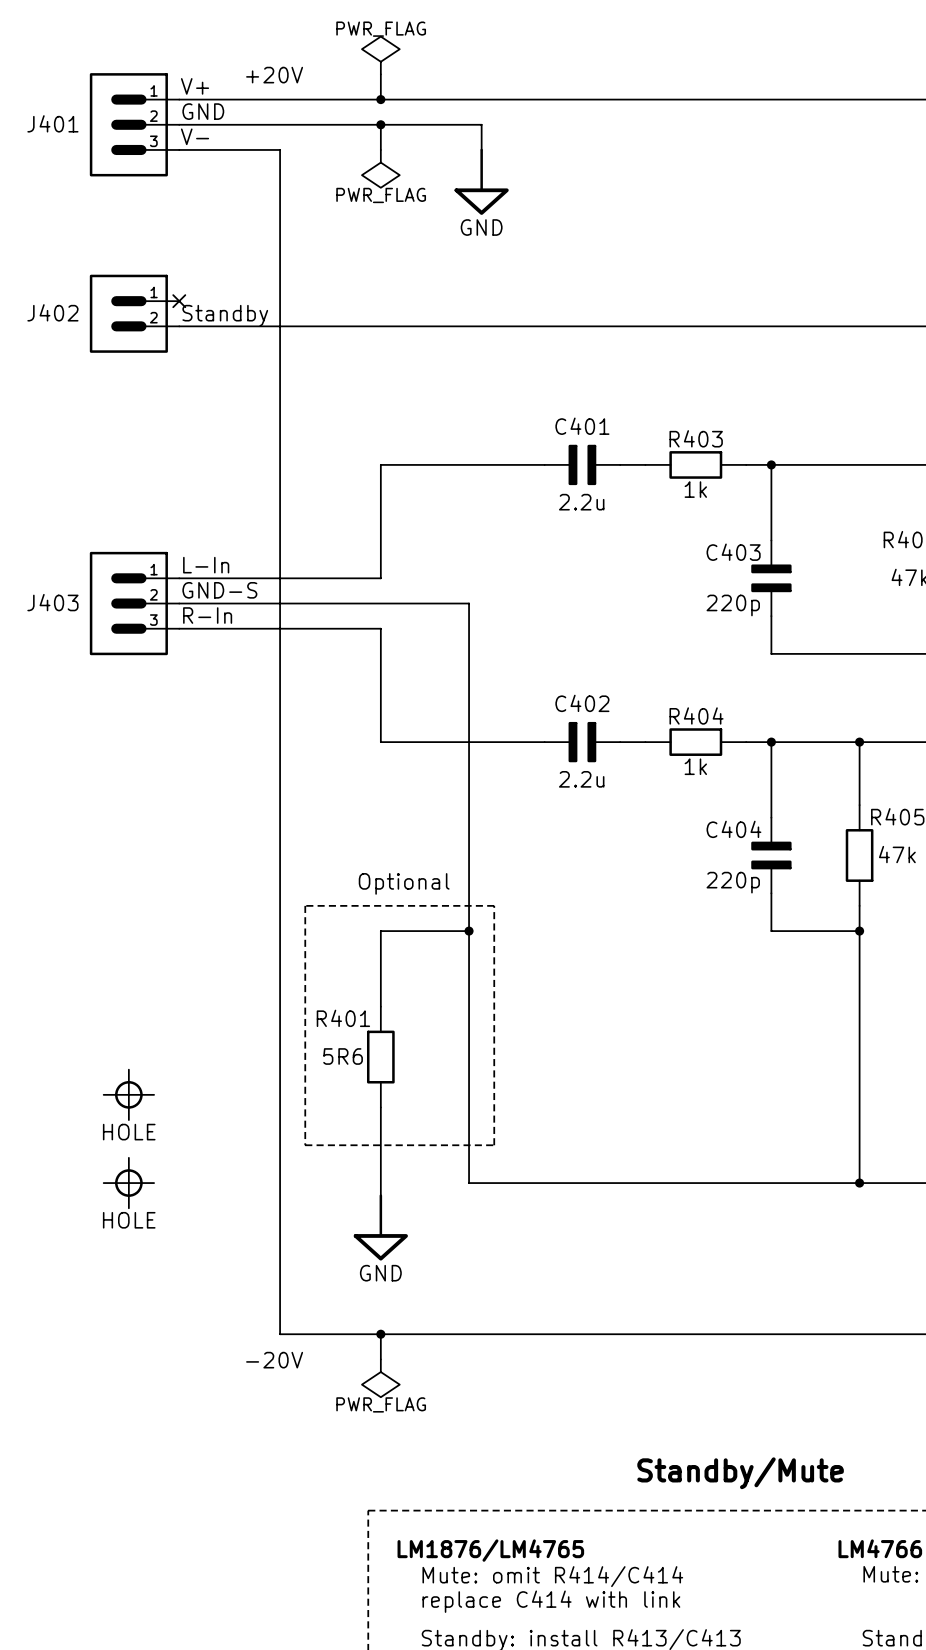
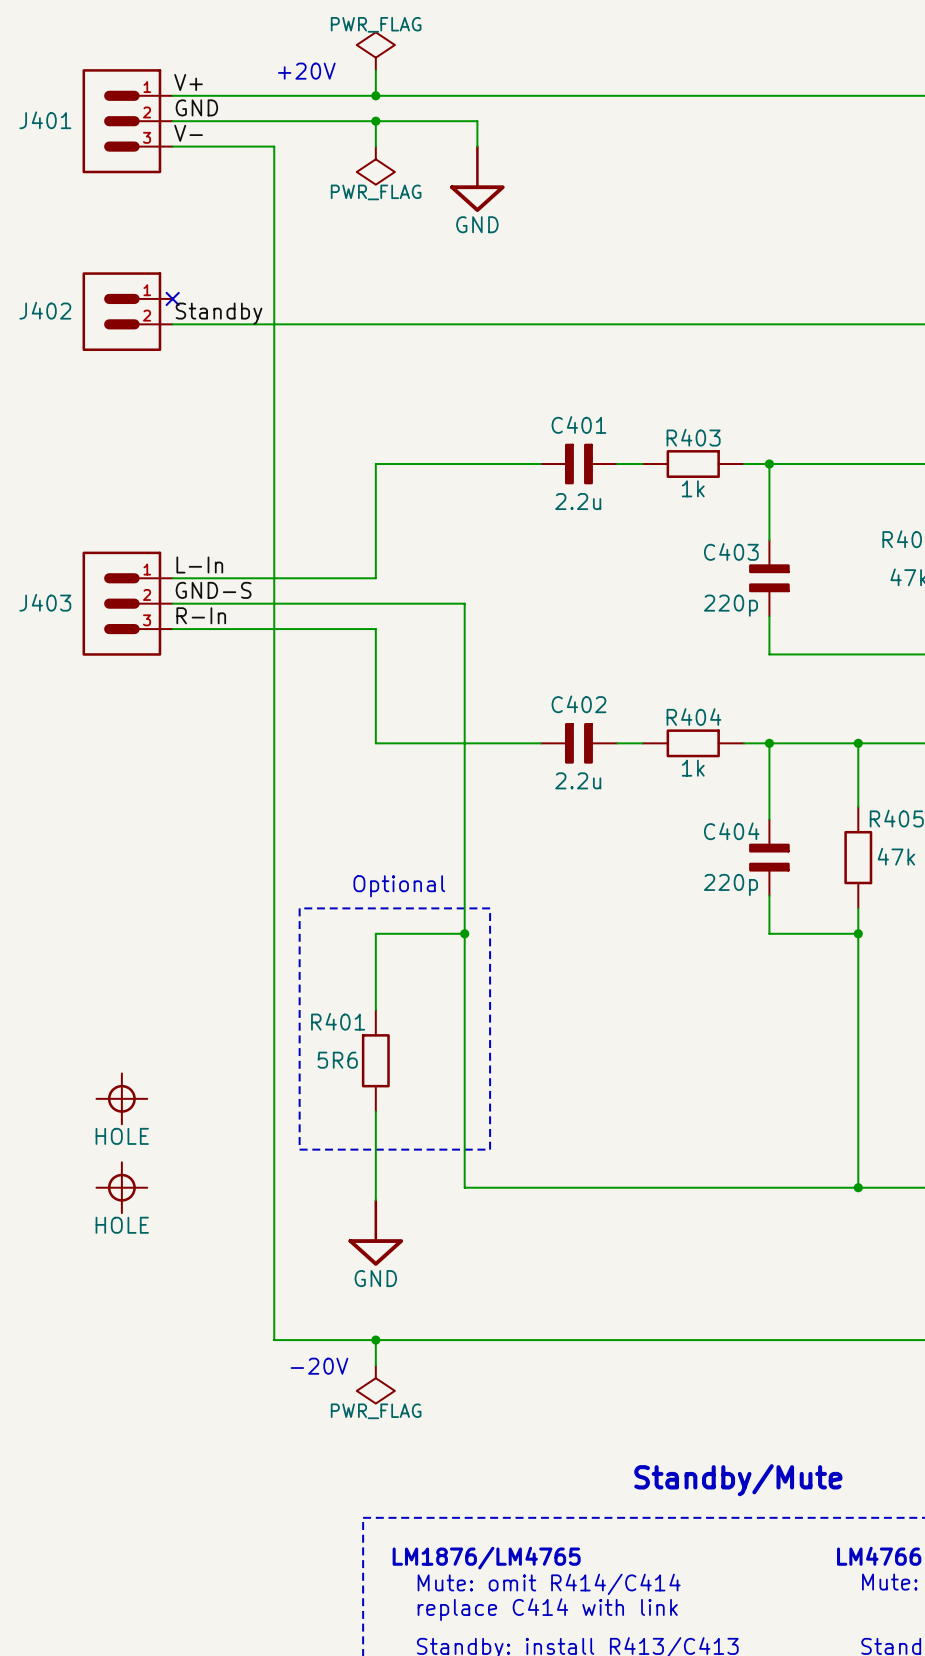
text position: +20V (274, 75) -> +20V (306, 71)
text position: -20V (274, 1360) -> -20V (319, 1366)

